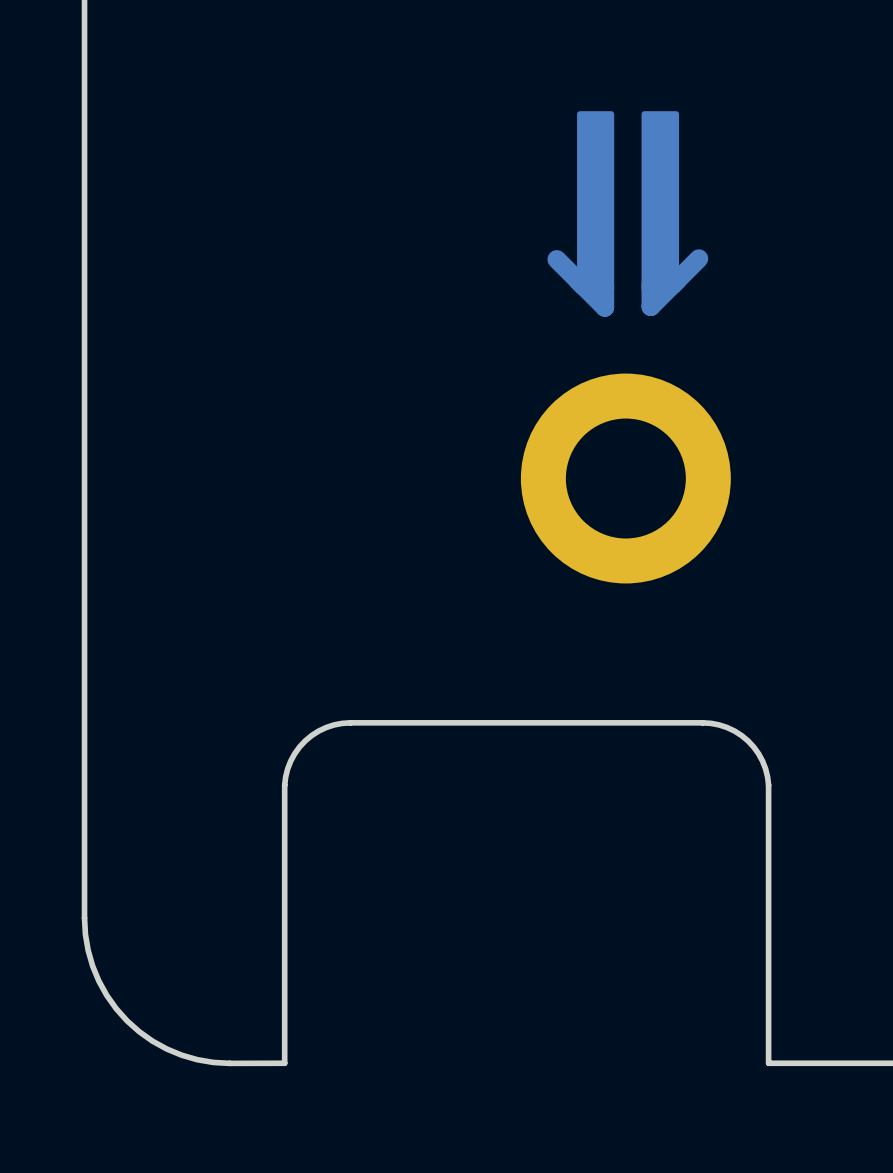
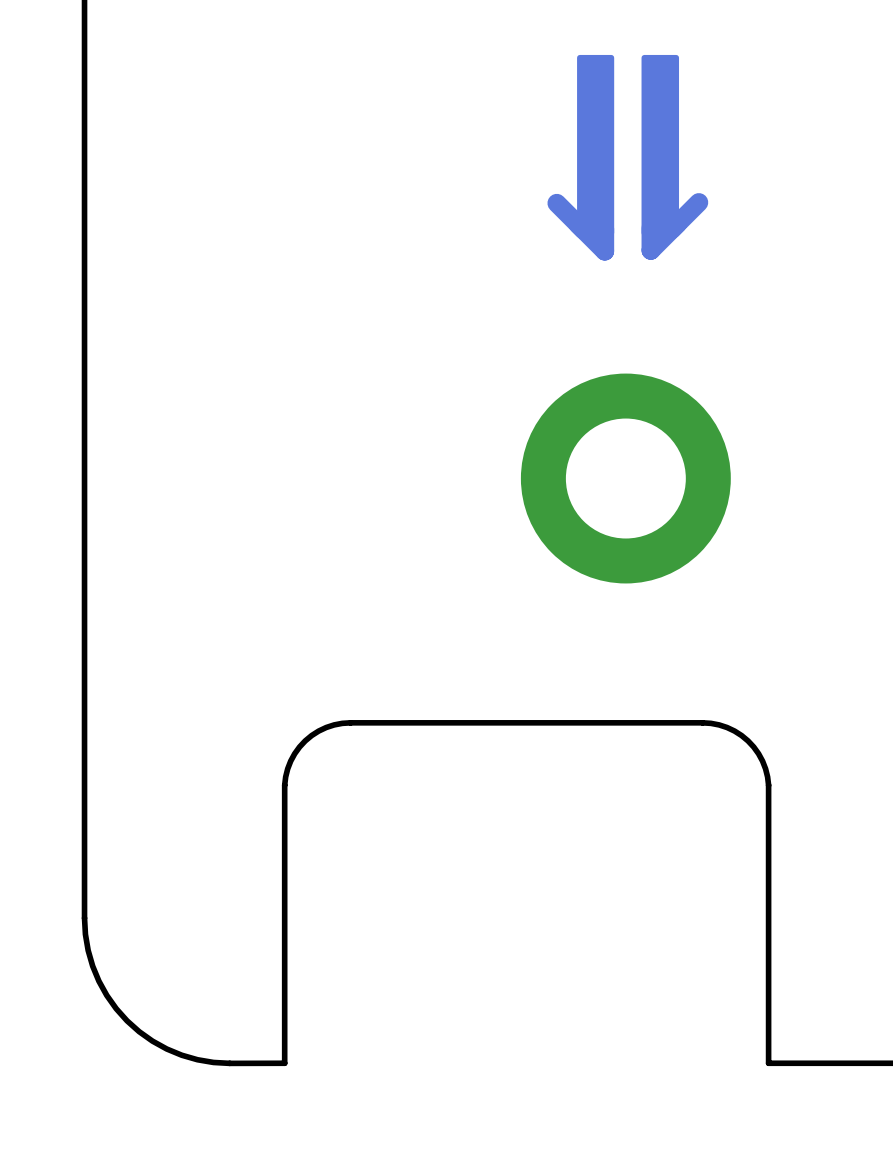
drawing: none -> [577, 54, 680, 236]
drawing: [577, 111, 680, 293] -> none
bottom track: (698, 258) (650, 306) (650, 284) -> (698, 202) (650, 250) (650, 227)
bottom track: (556, 259) (604, 307) (604, 284) -> (556, 203) (604, 251) (604, 228)

